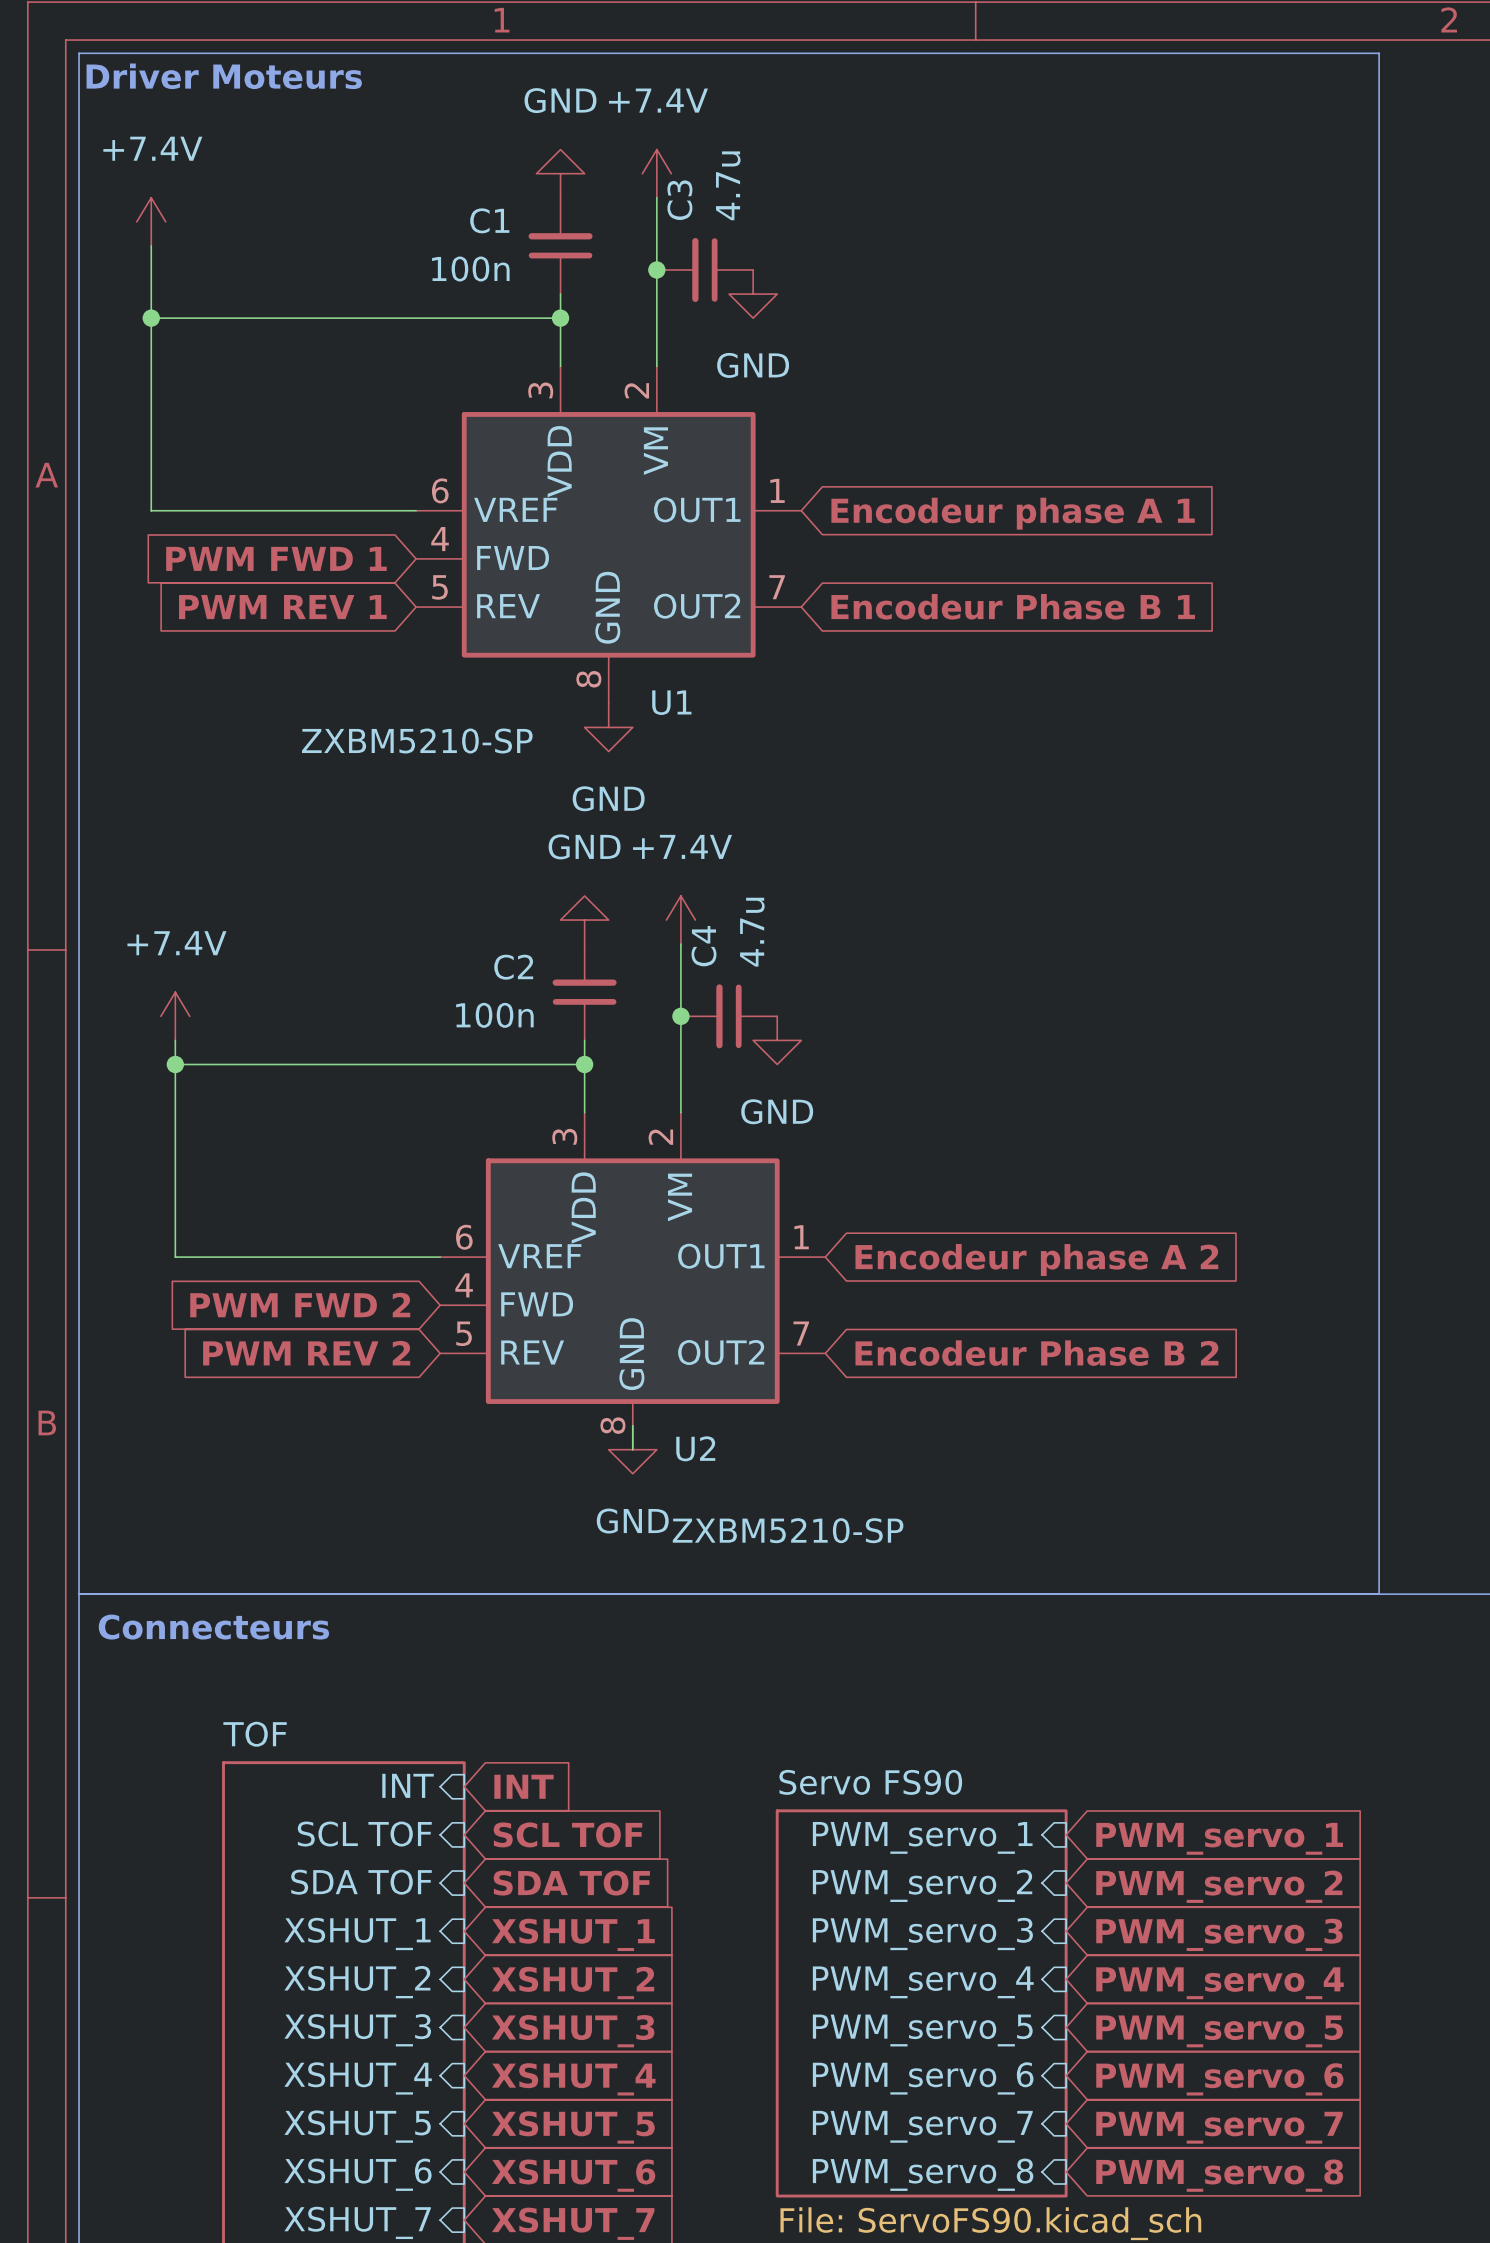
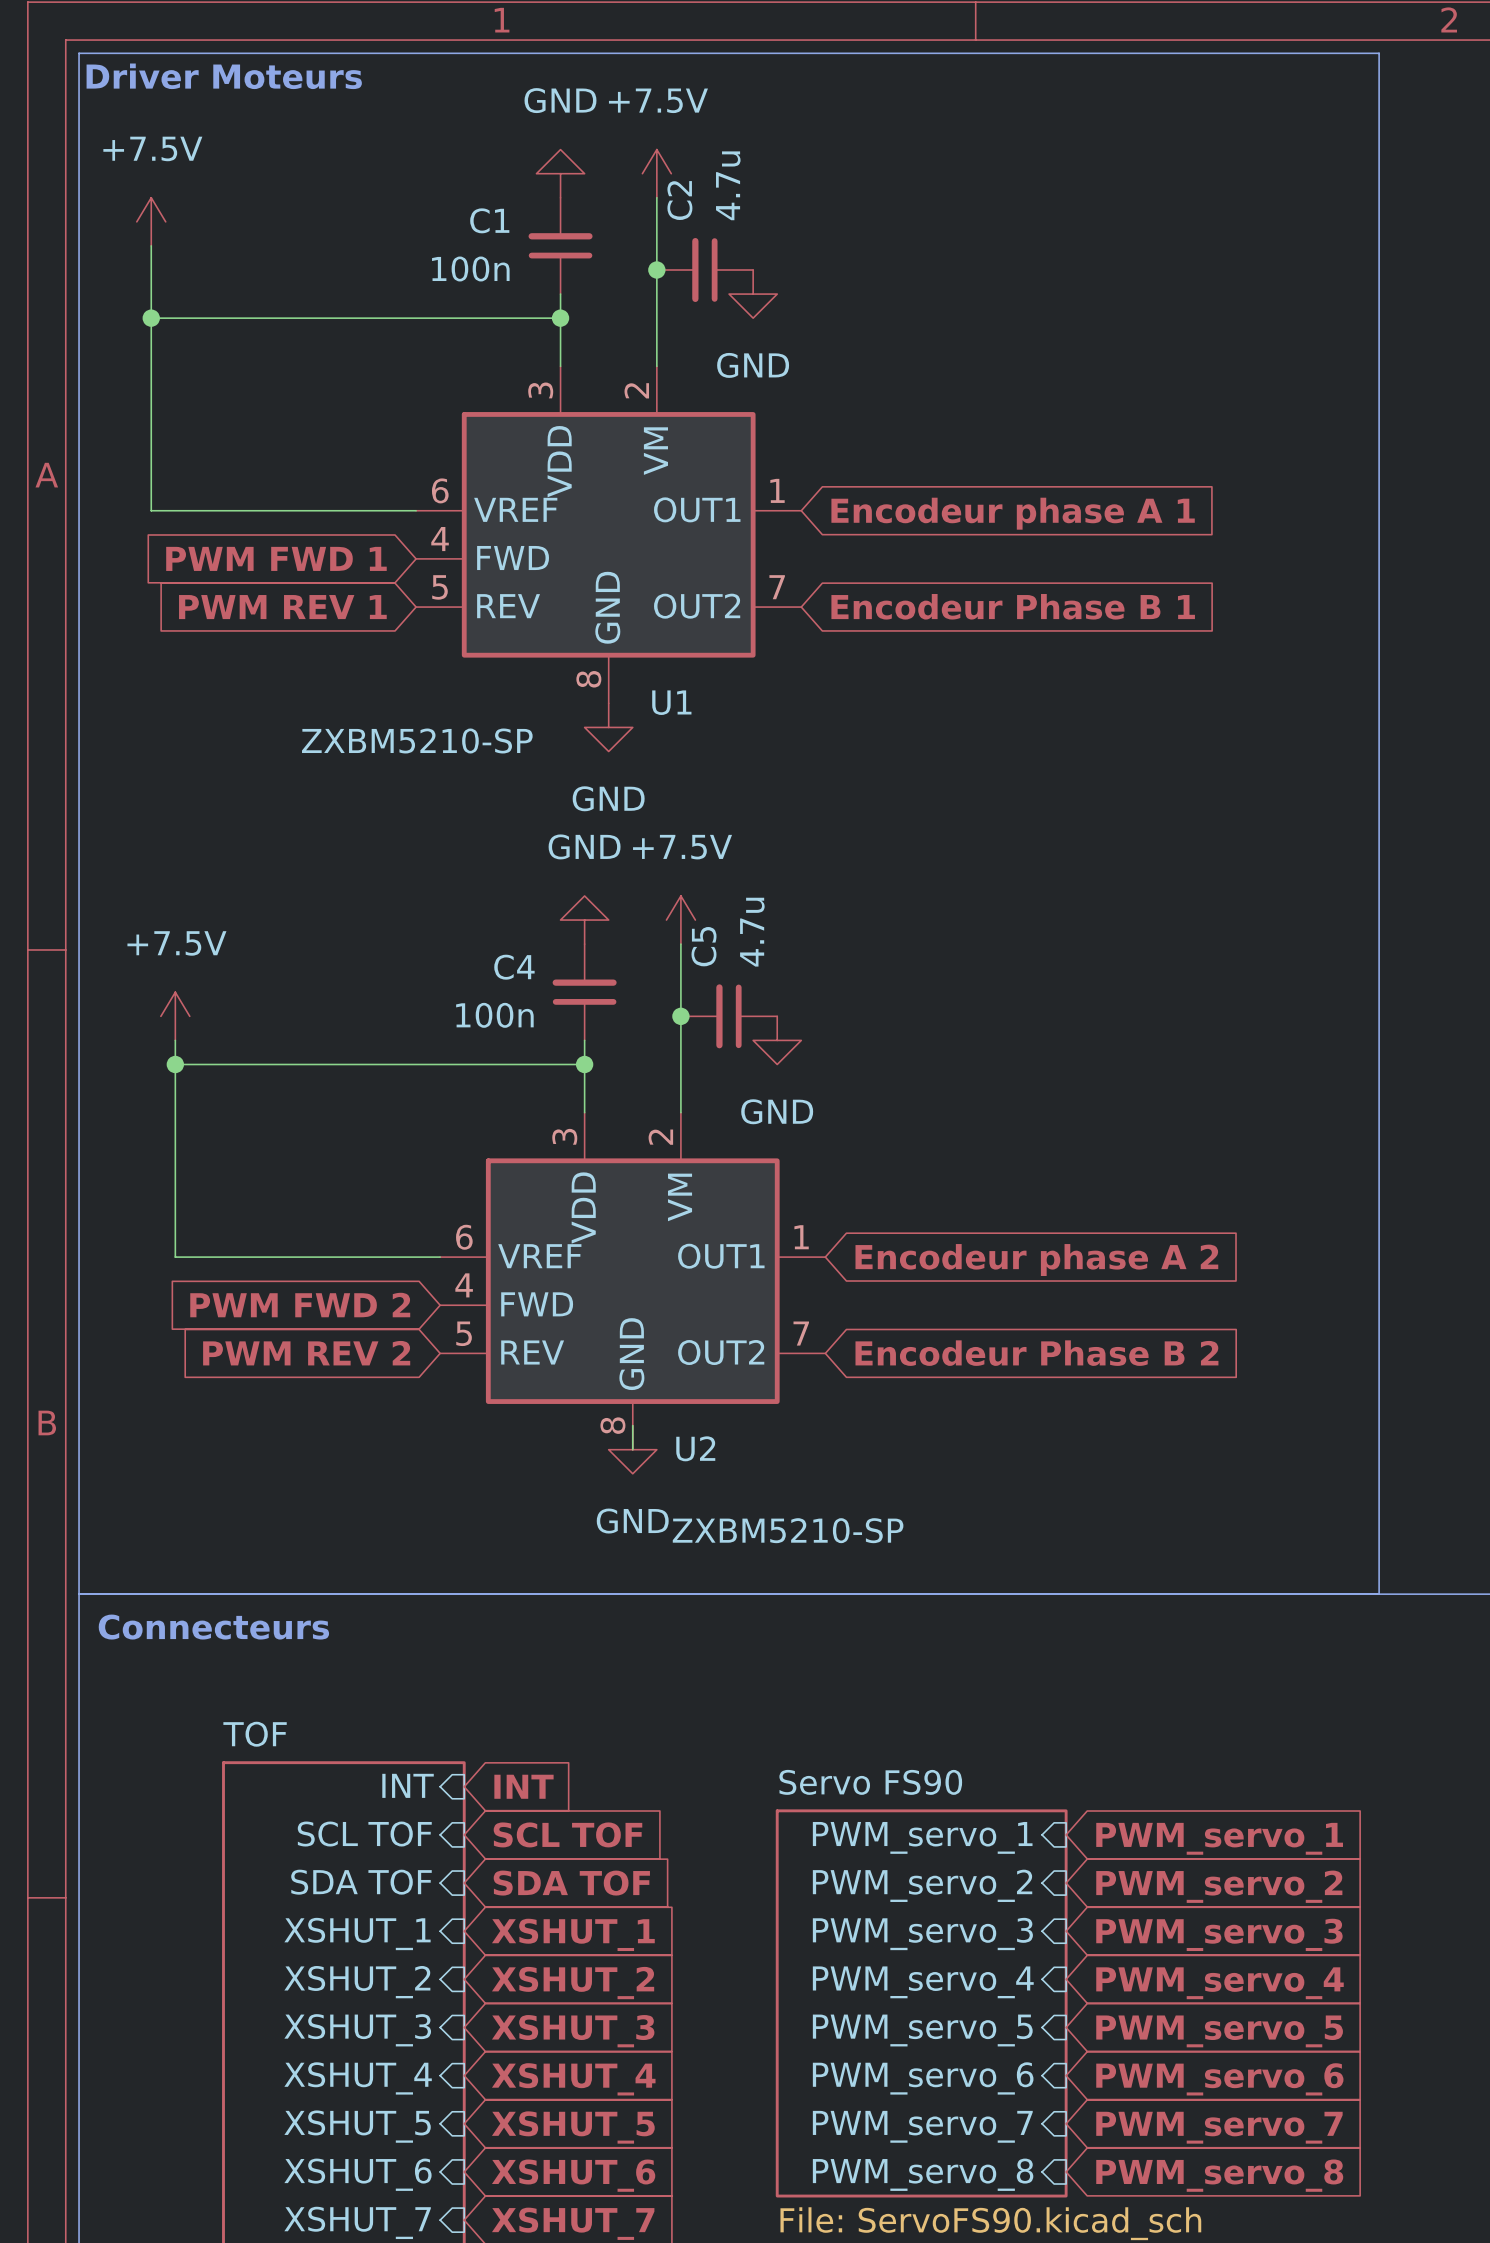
power symbol: +7.4V (656, 173) -> +7.5V (656, 173)
C3 name: C3 (679, 200) -> C2 (679, 200)
power symbol: +7.4V (151, 221) -> +7.5V (151, 221)
power symbol: +7.4V (680, 920) -> +7.5V (680, 920)
C4 name: C4 (703, 946) -> C5 (703, 946)
C2 name: C2 (513, 967) -> C4 (514, 967)
power symbol: +7.4V (175, 1016) -> +7.5V (175, 1016)

